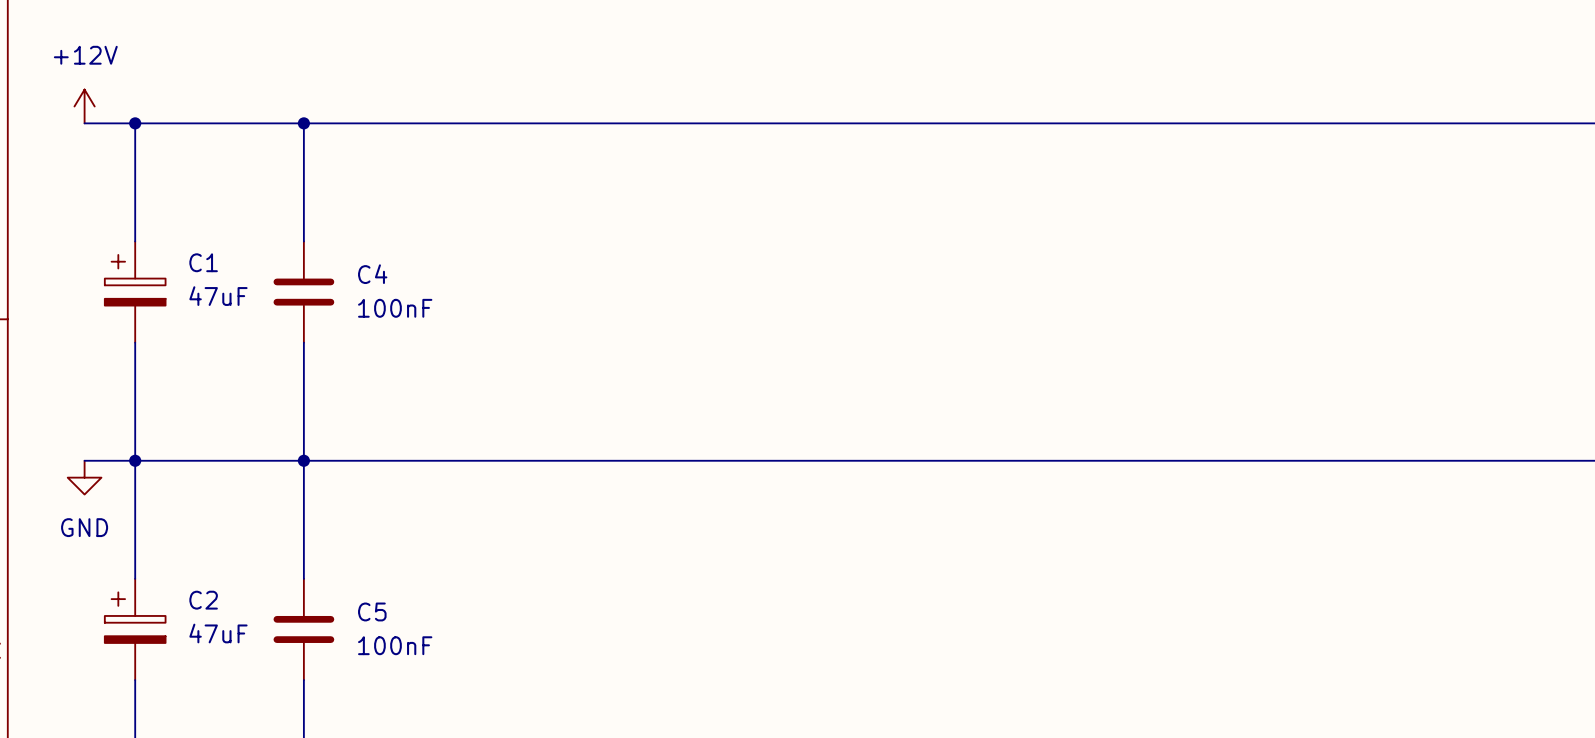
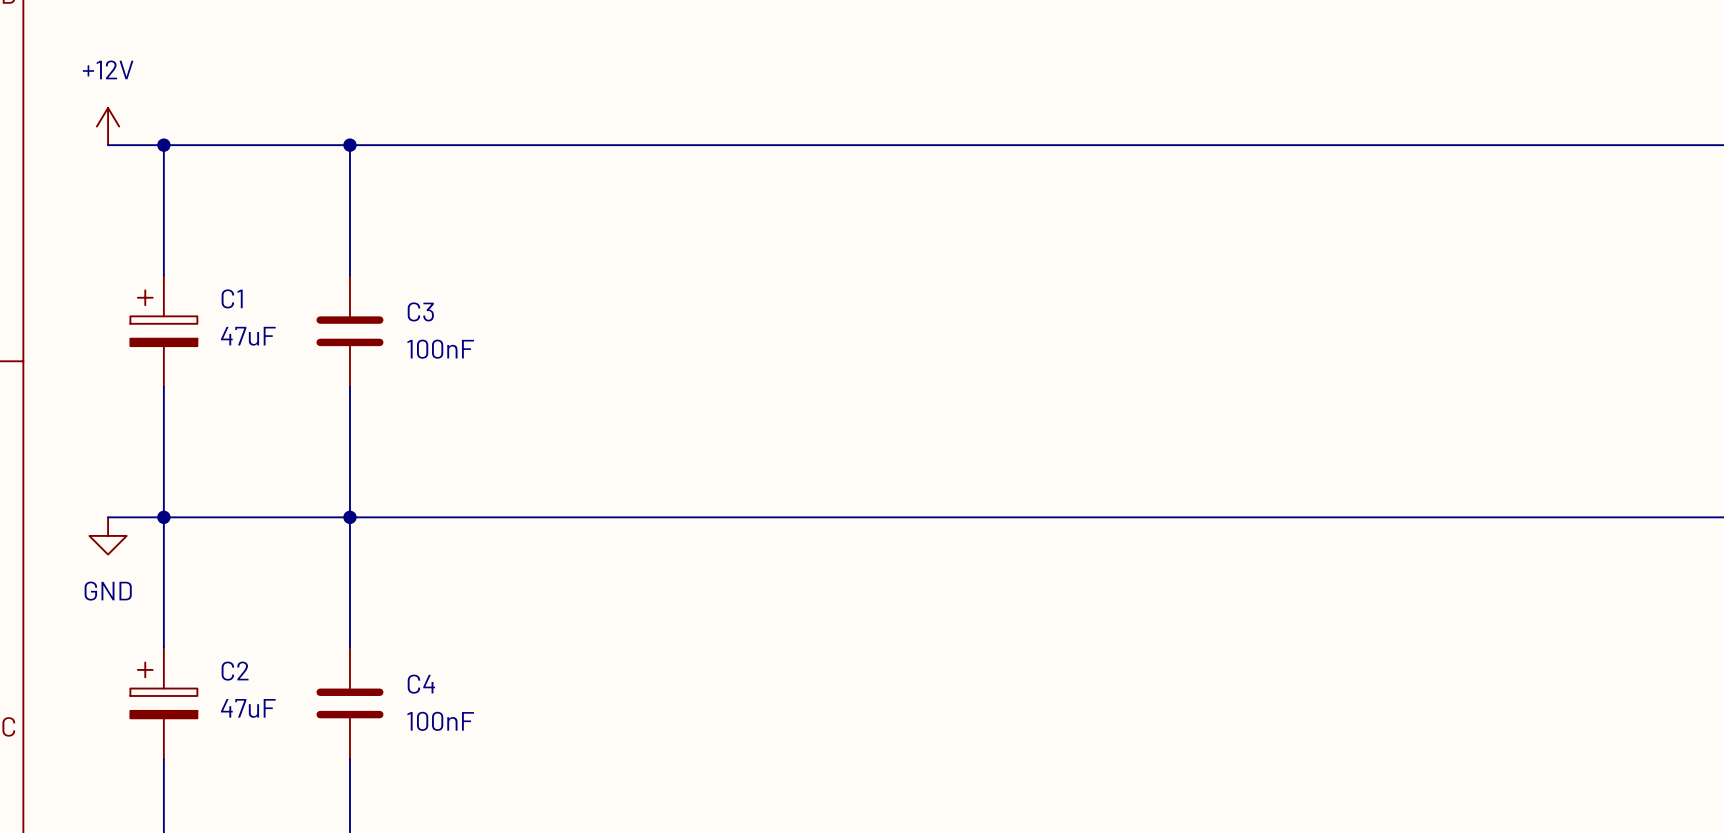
C4 name: C4 (372, 274) -> C3 (420, 311)
C5 name: C5 (372, 611) -> C4 (421, 684)

